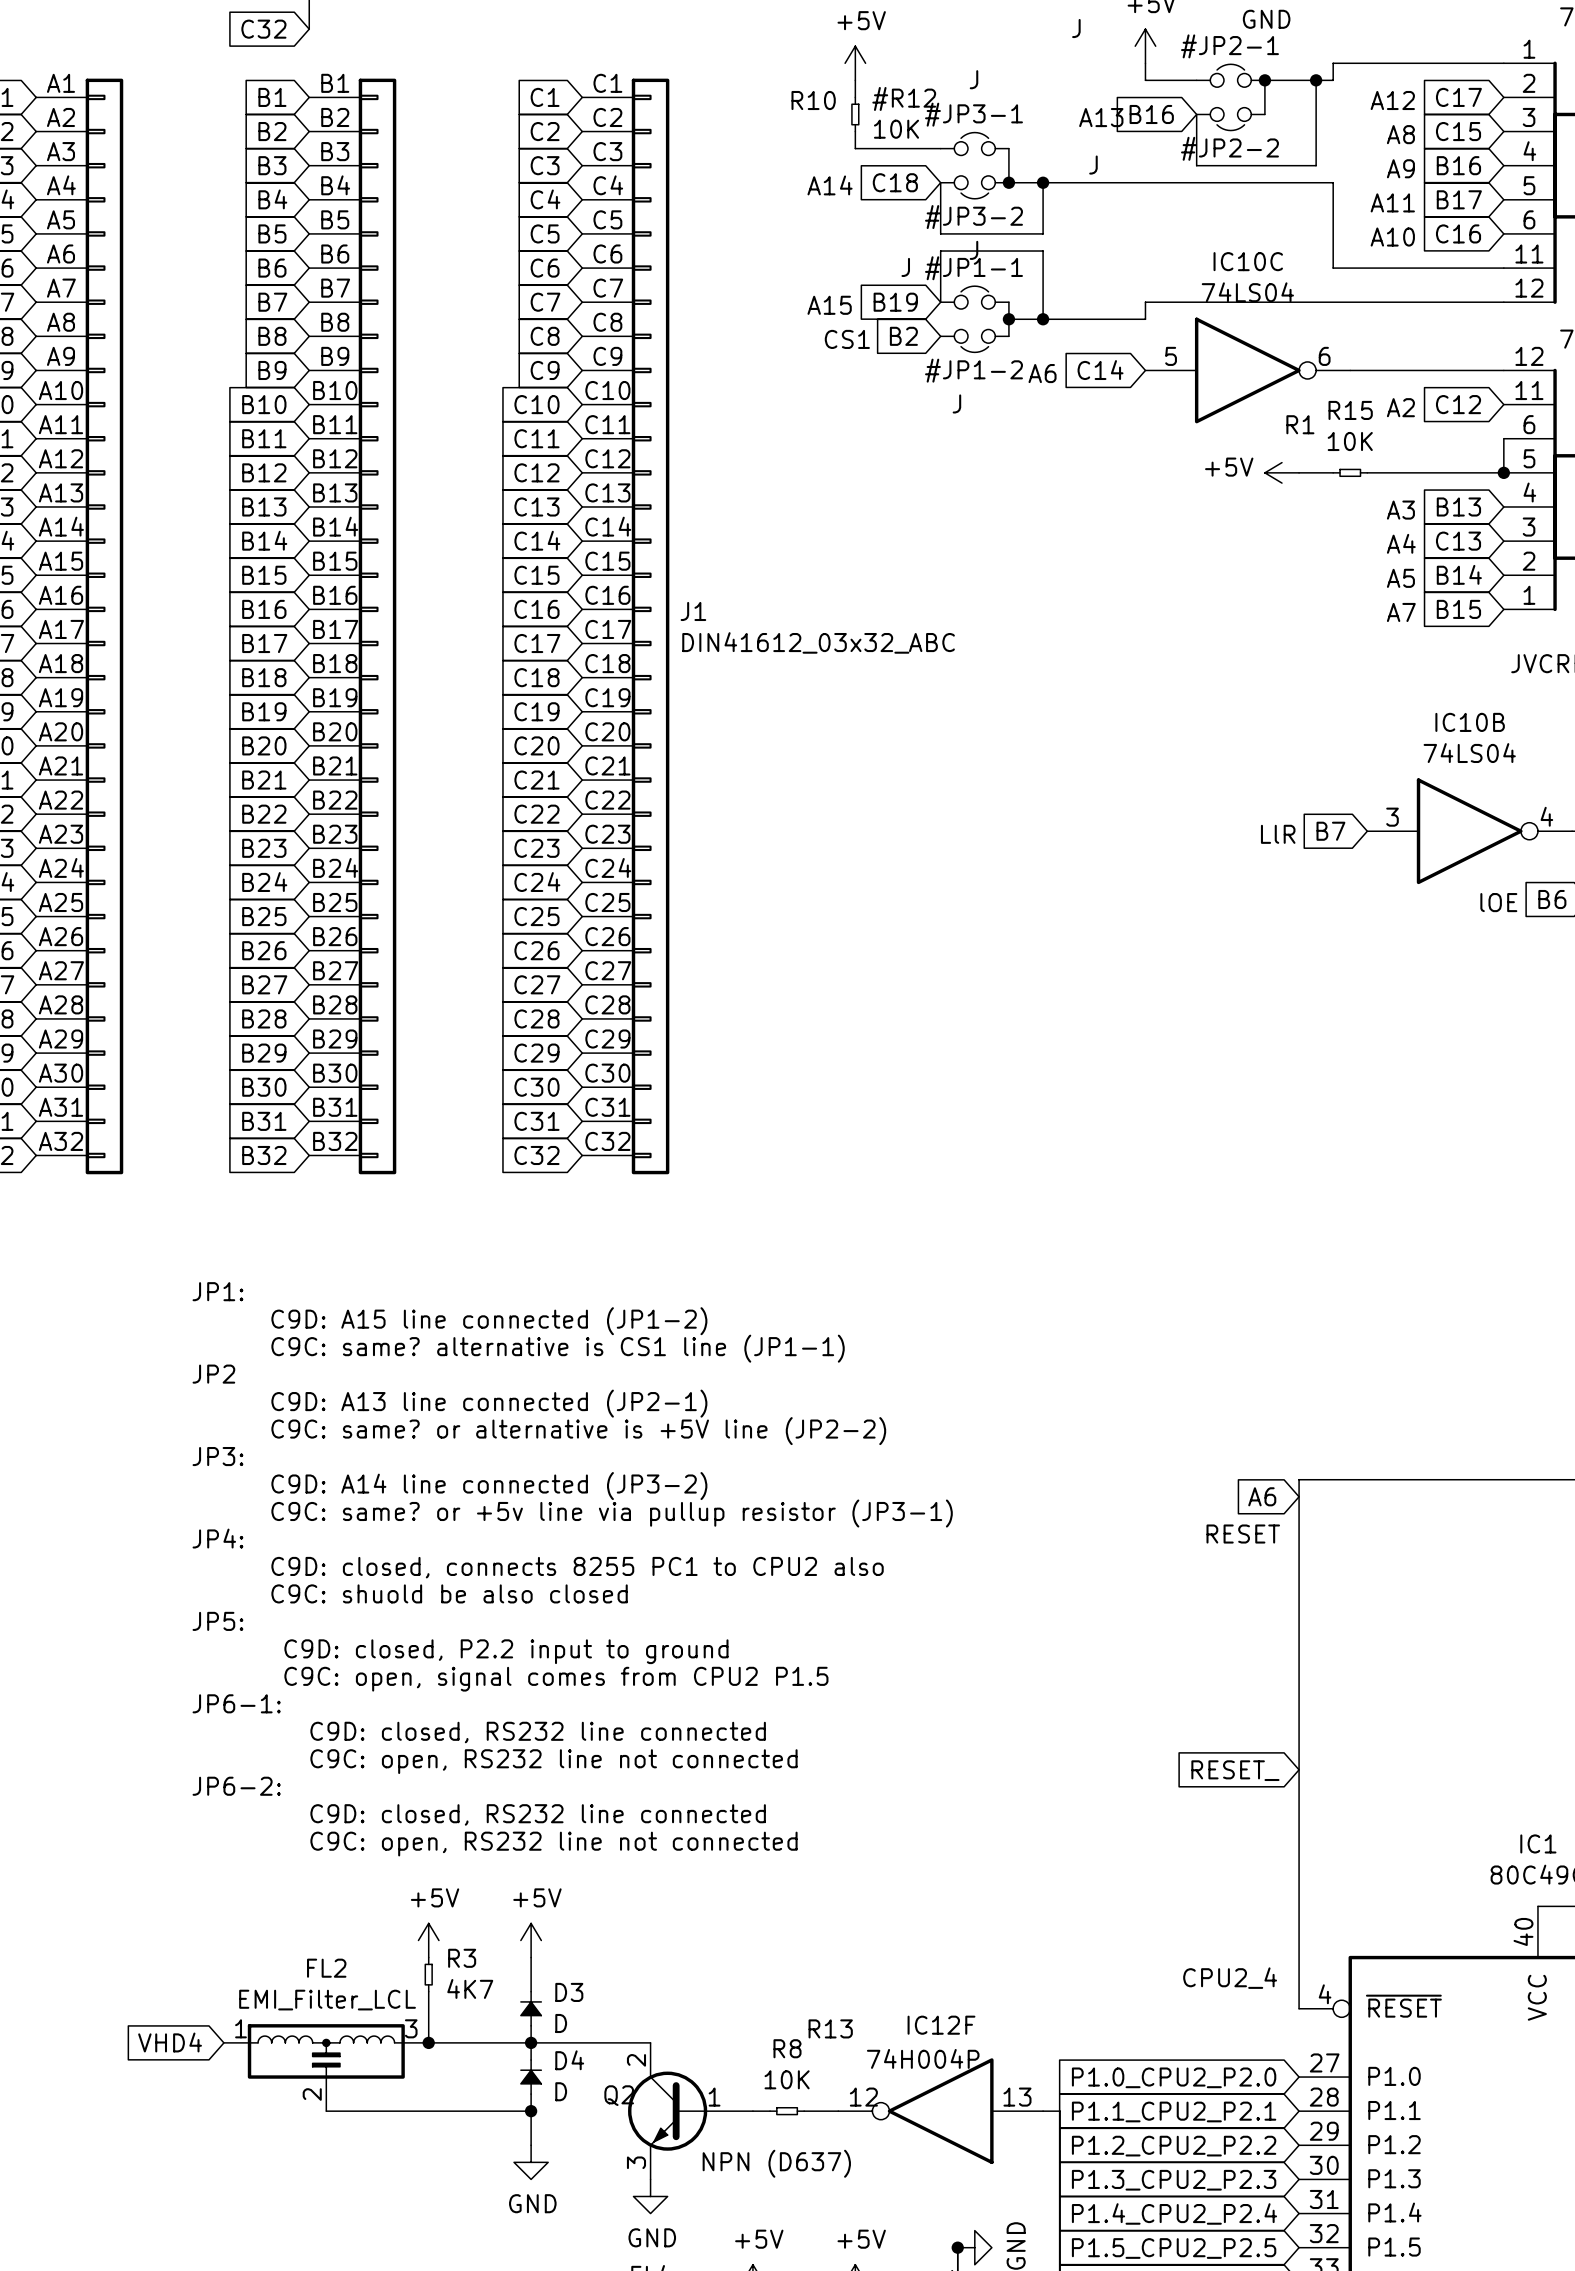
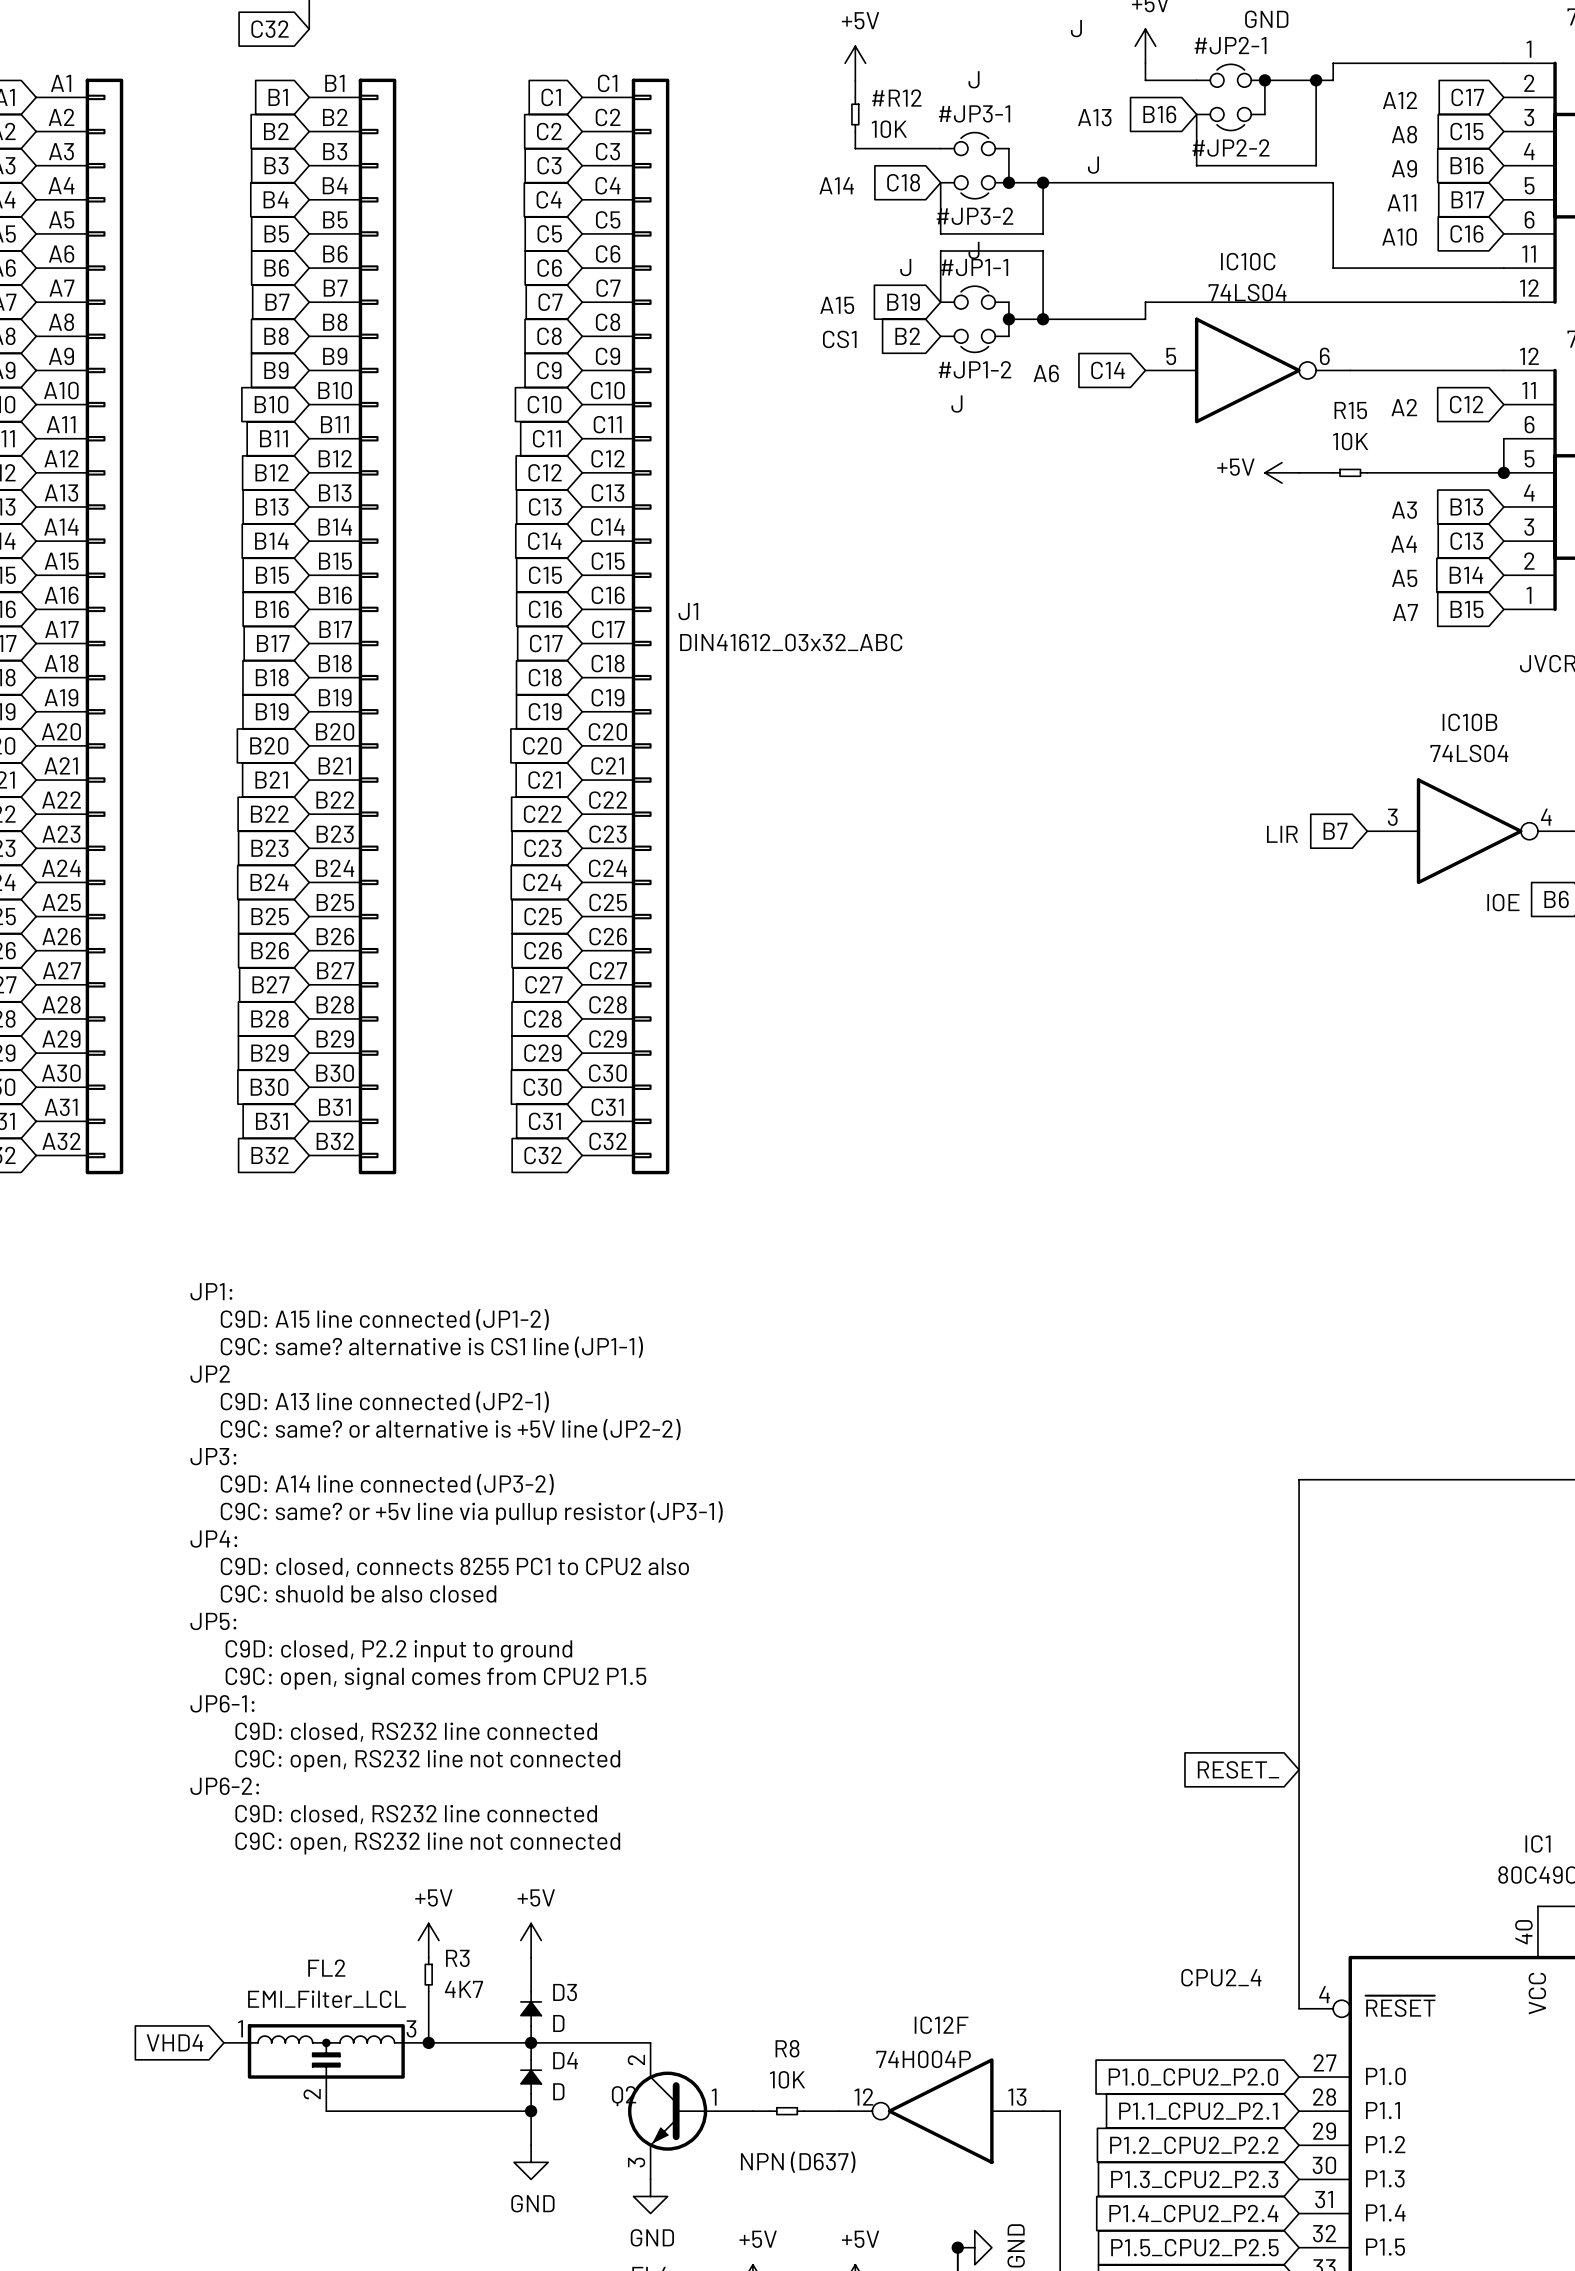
text: R10 (813, 100) -> none
text: R1 (1300, 424) -> none
global label: A6 (1262, 1496) -> none
text: RESET (1243, 1534) -> none
text: R13 (830, 2028) -> none

